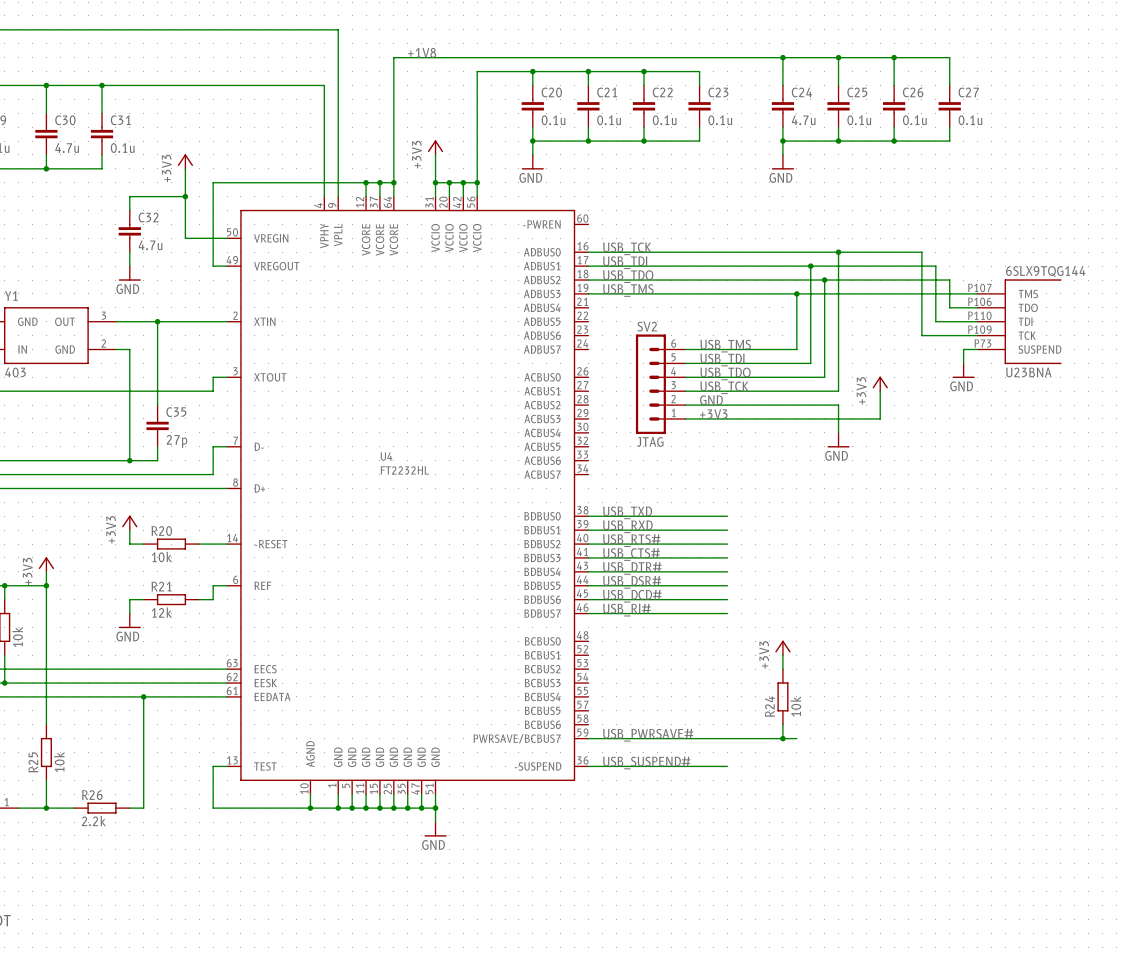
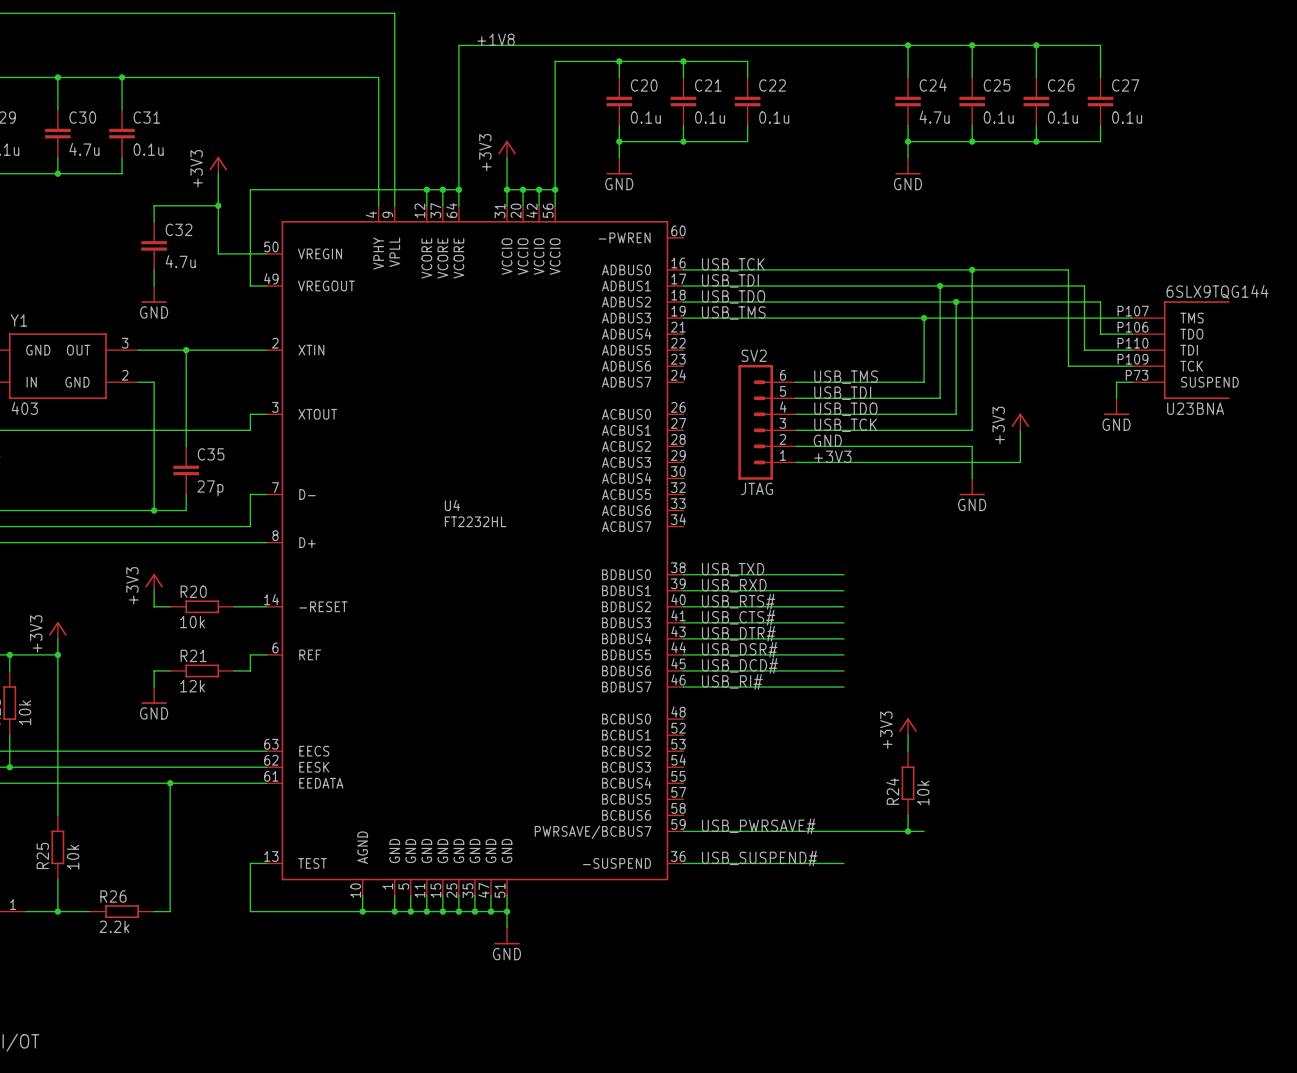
wire: (643, 71) (699, 71) (699, 85) -> none
junction: (643, 71) -> none
C23: 0.1u (699, 106) -> none
wire: (699, 127) (699, 141) (643, 141) -> none
junction: (643, 141) -> none

